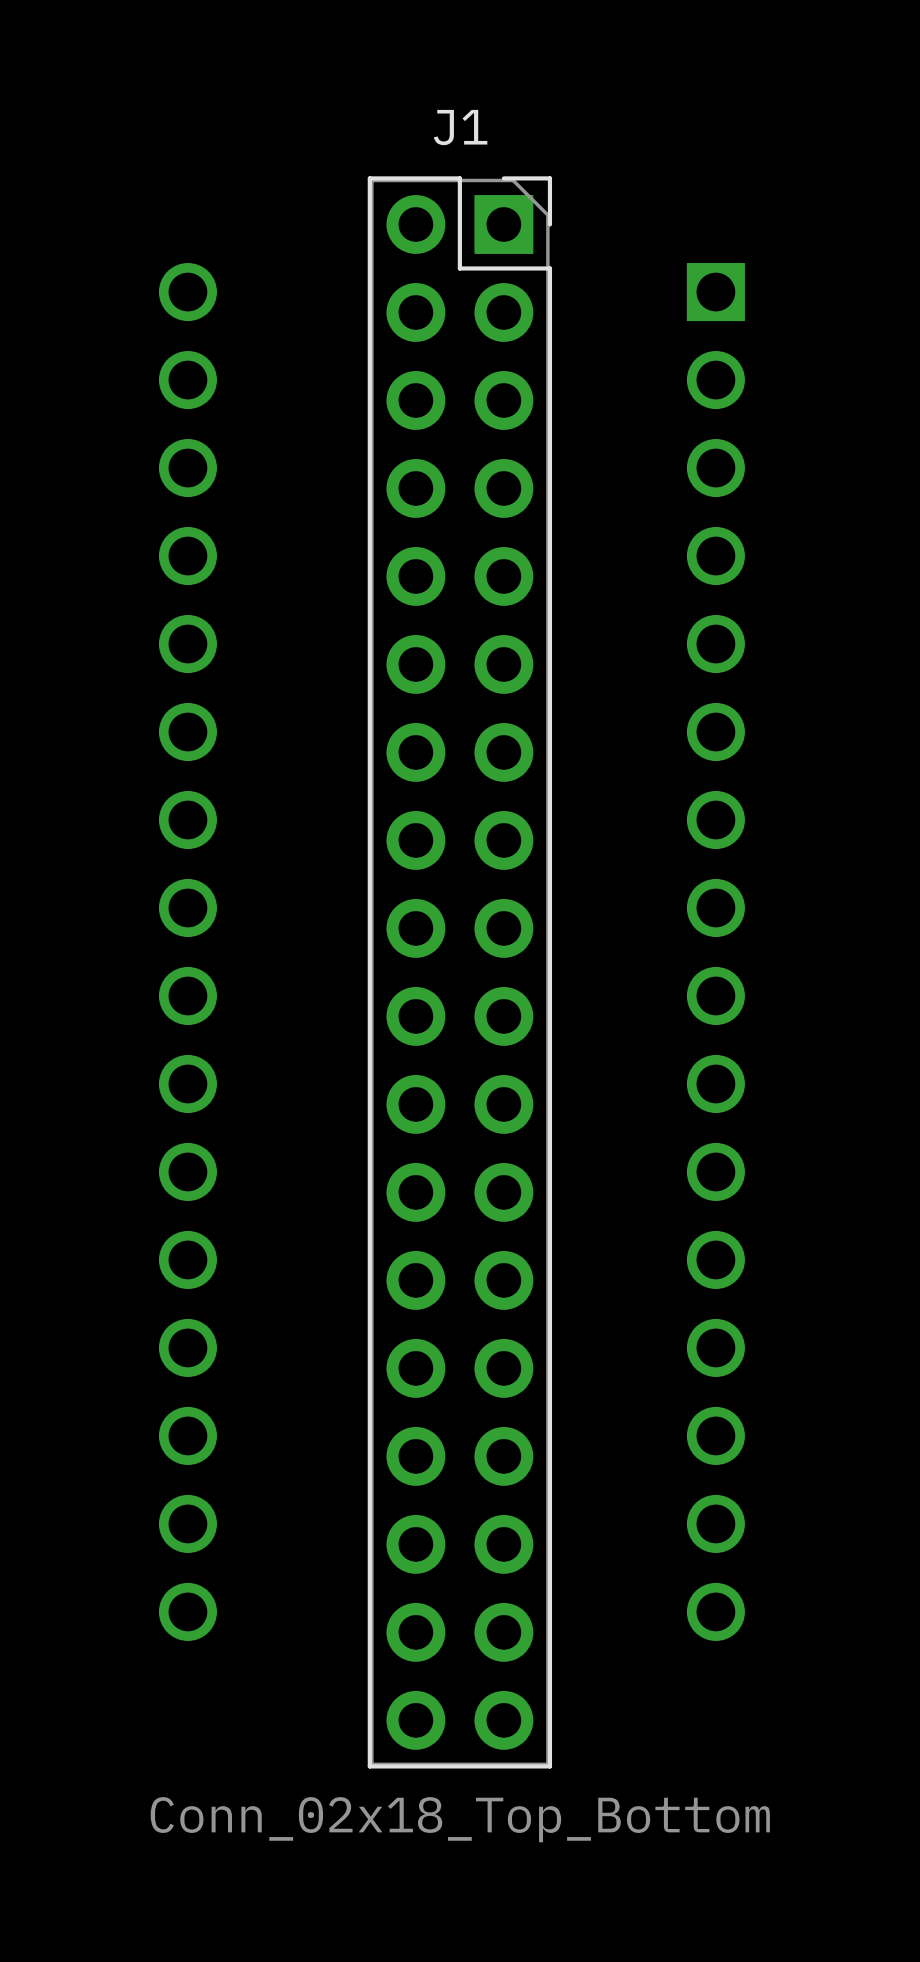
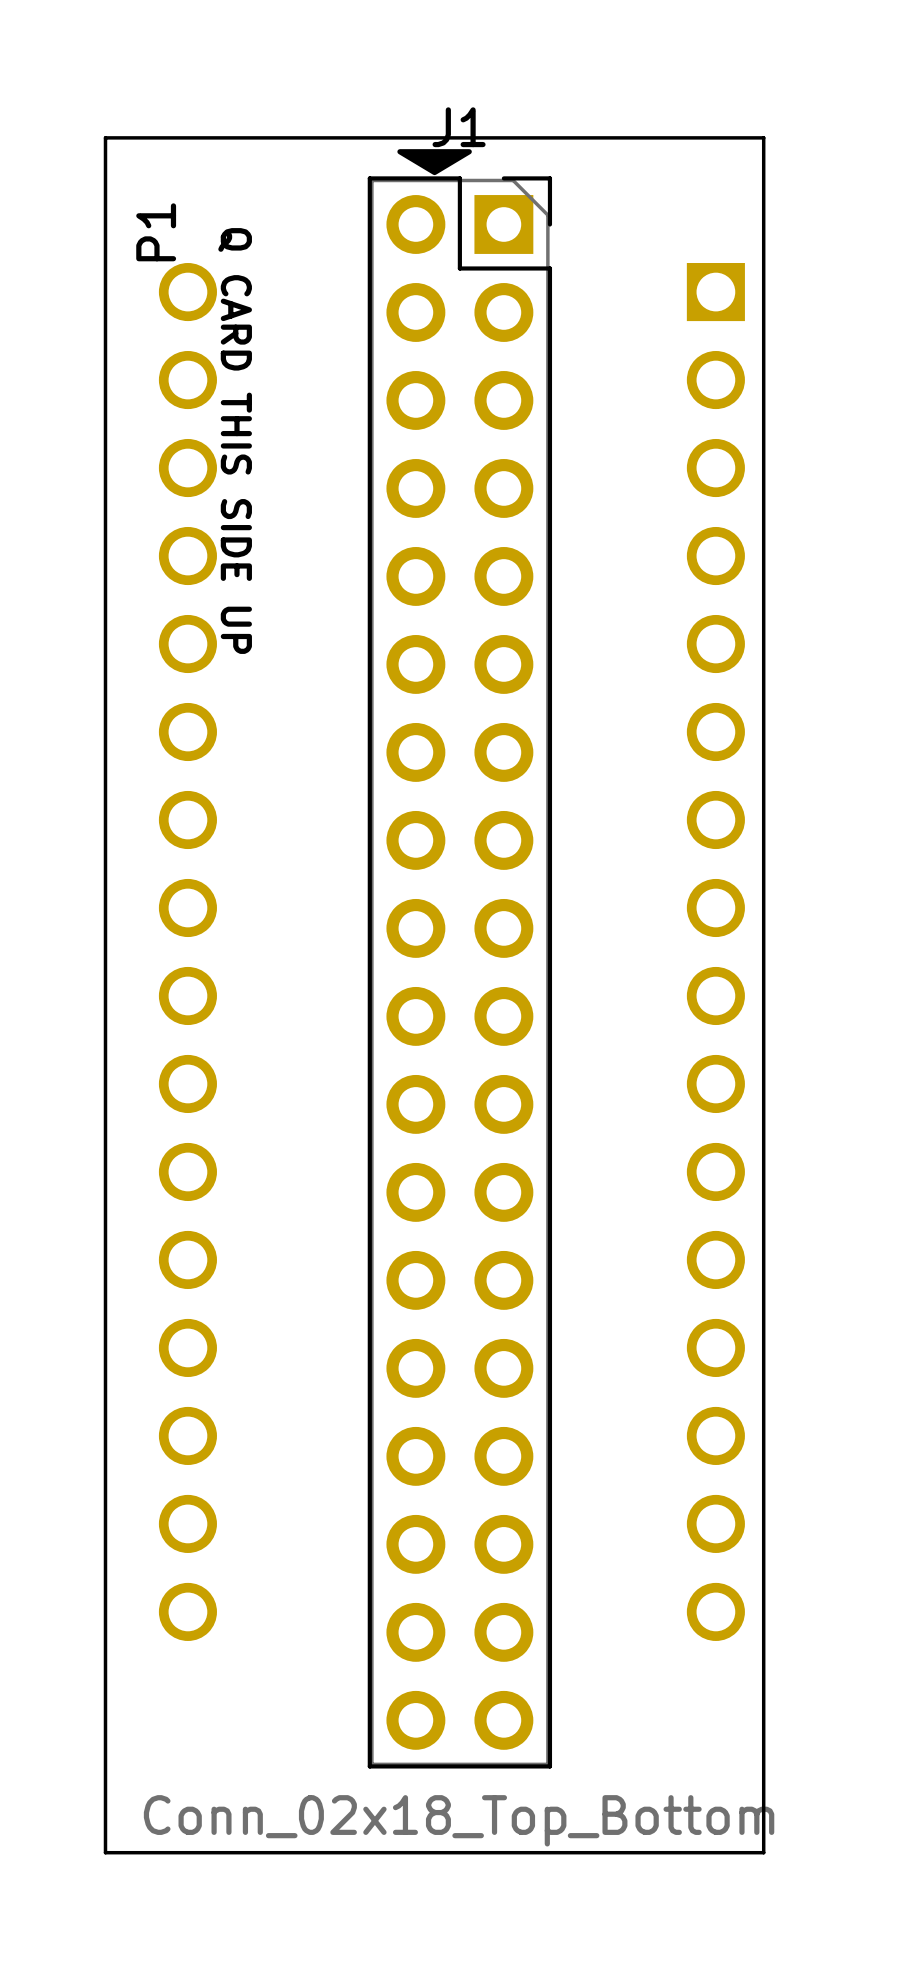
board edge: none -> (105, 137) (763, 137) (763, 1852) (105, 1852) (105, 137)
drawing: none -> [397, 149, 472, 176]
text: none -> P1 (156, 232)
text: none -> Q CARD THIS SIDE UP (235, 441)

